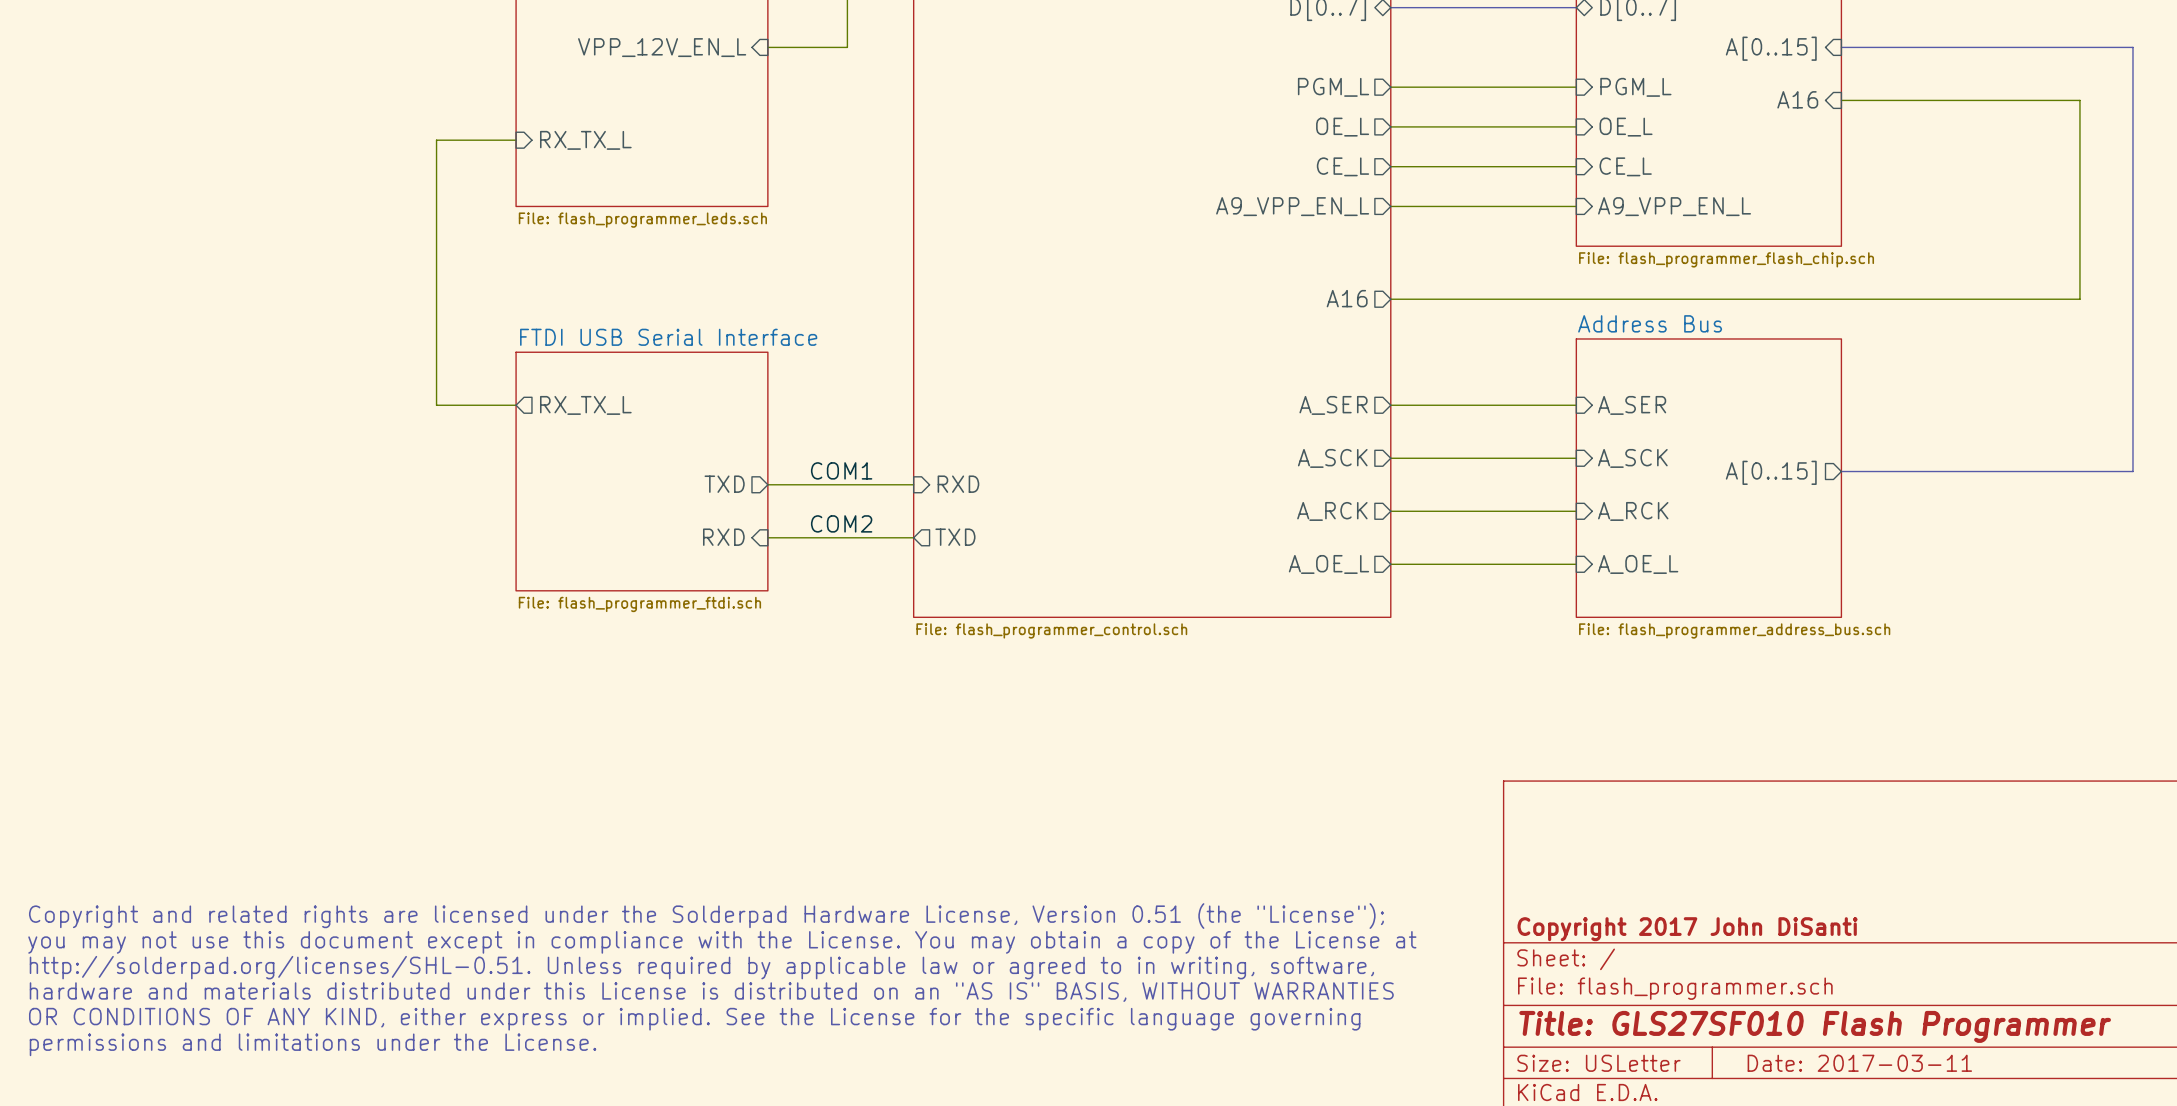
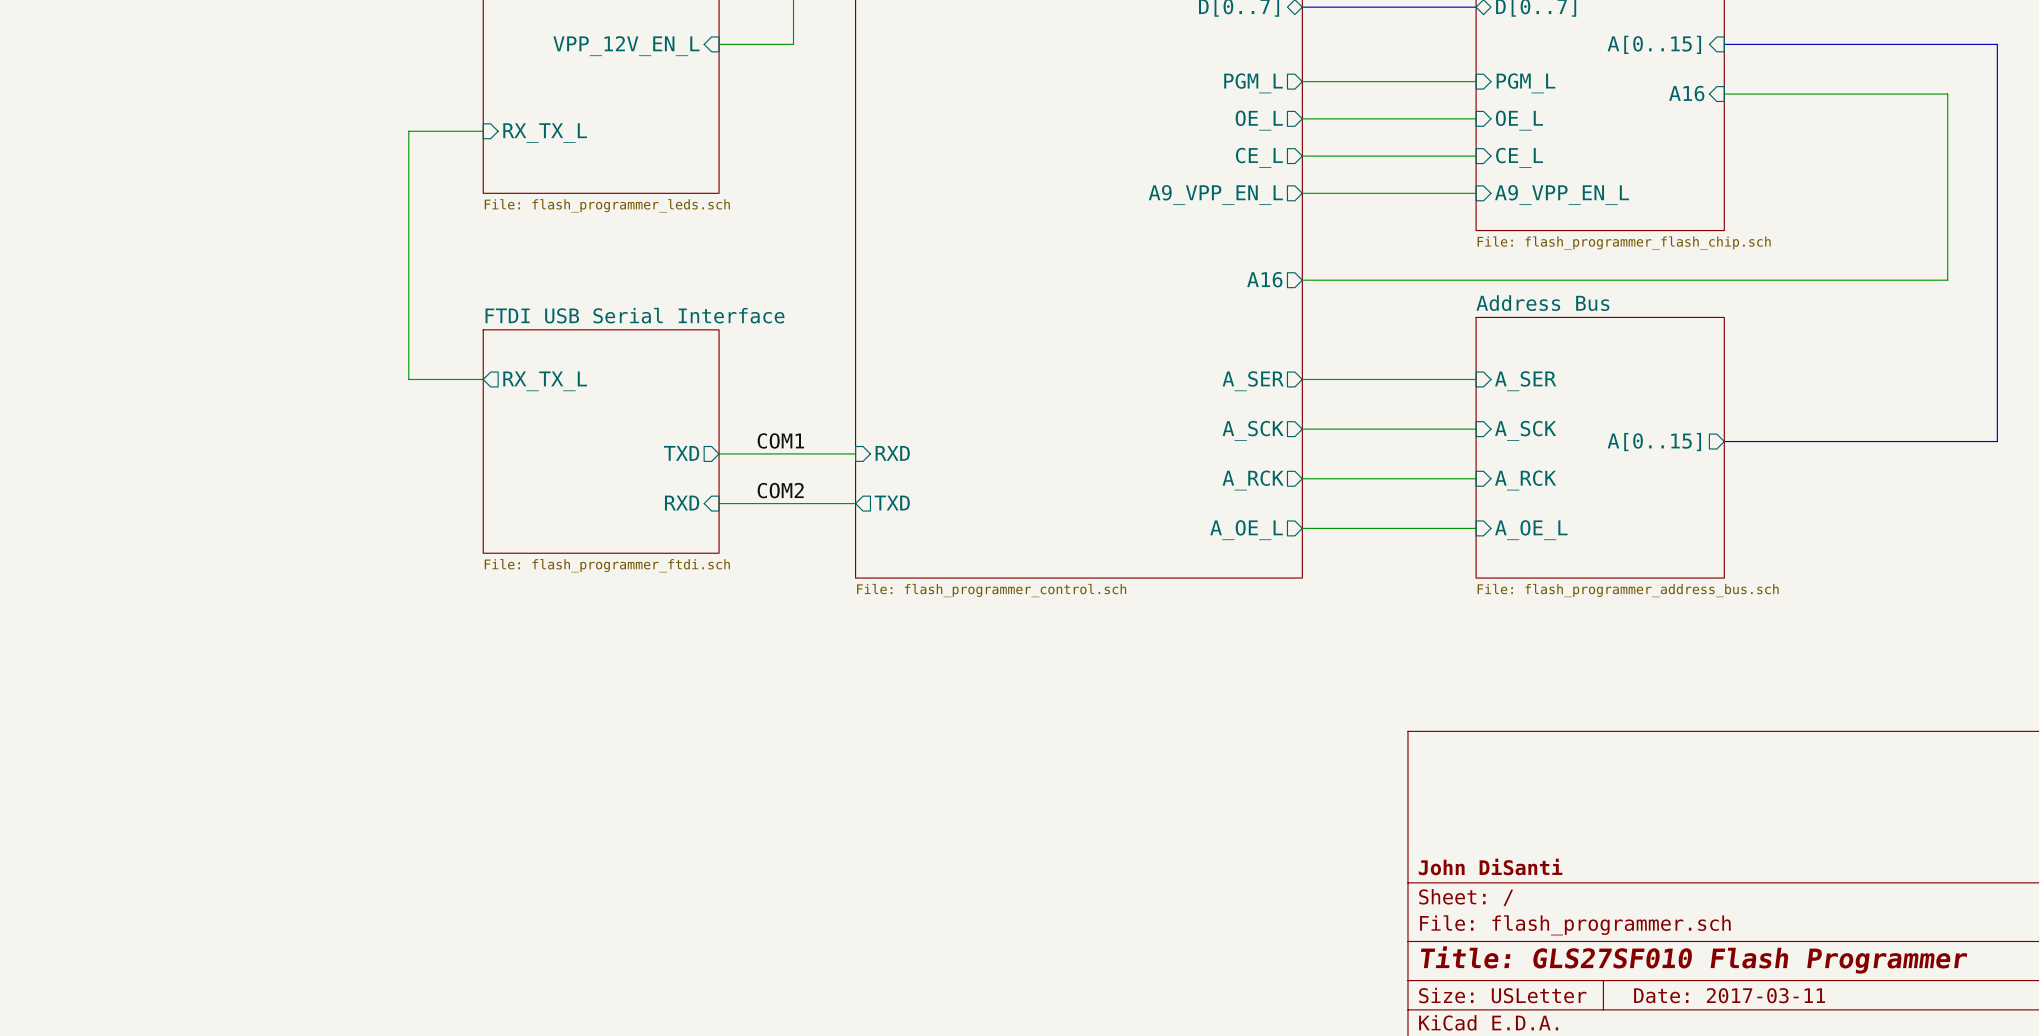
text: Copyright and related rights are licensed under the Solderpad Hardware License, Version 0.51 (the "License"); (706, 916) -> none
title block: Copyright 2017 John DiSanti (1687, 929) -> John DiSanti (1490, 866)
text: you may not use this document except in compliance with the License. You may obtain a copy of the License at (722, 942) -> none
text: http://solderpad.org/licenses/SHL-0.51. Unless required by applicable law or agreed to in writing, software, (701, 967) -> none
text: hardware and materials distributed under this License is distributed on an "AS IS" BASIS, WITHOUT WARRANTIES (711, 992) -> none
text: OR CONDITIONS OF ANY KIND, either express or implied. See the License for the specific language governing (694, 1019) -> none
text: permissions and limitations under the License. (313, 1044) -> none

